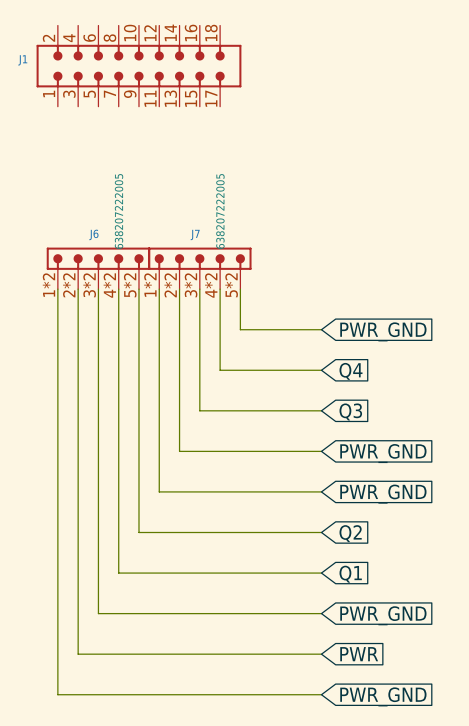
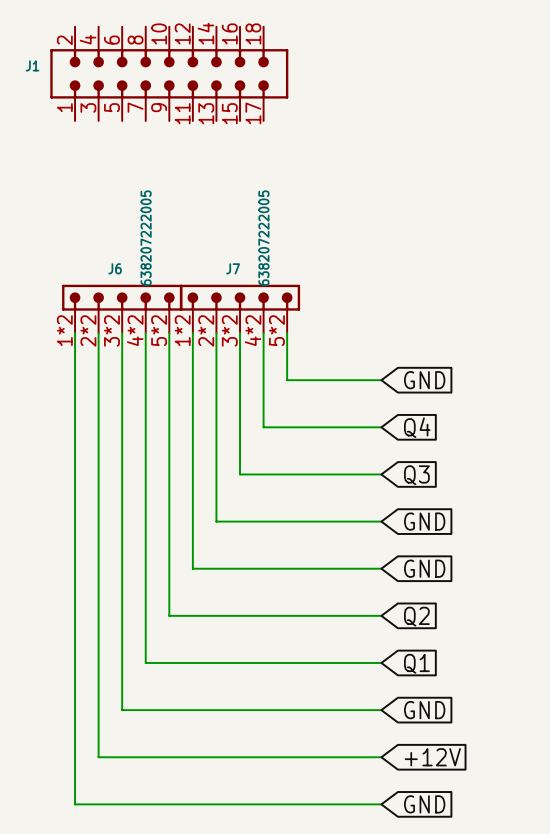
global label: PWR_GND (383, 331) -> GND (424, 380)
global label: PWR_GND (383, 453) -> GND (424, 521)
global label: PWR_GND (383, 494) -> GND (424, 568)
global label: PWR_GND (383, 615) -> GND (424, 710)
global label: PWR (359, 654) -> +12V (432, 757)
global label: PWR_GND (383, 696) -> GND (424, 804)

